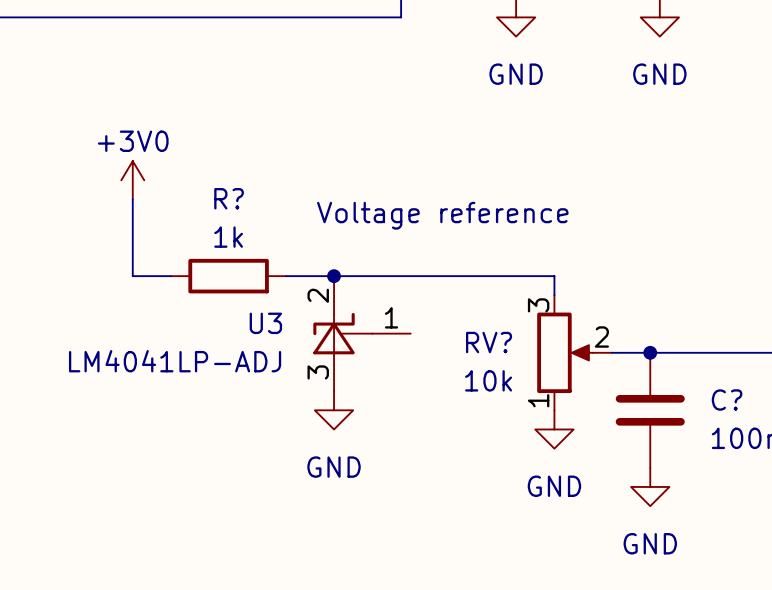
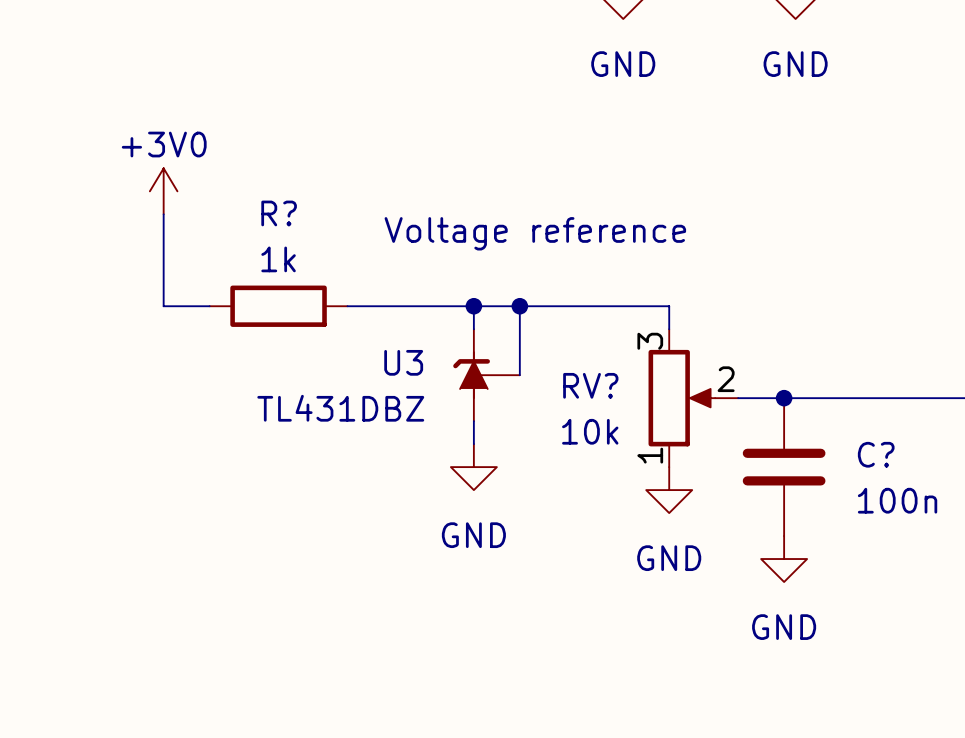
U3 symbol: [313, 276, 411, 392] -> [453, 329, 520, 422]
junction: (334, 276) -> none
wire: none -> (473, 306) (473, 329)
junction: none -> (473, 306)
wire: none -> (519, 306) (519, 375)
junction: none -> (519, 306)
U3 value: LM4041LP-ADJ (175, 361) -> TL431DBZ (340, 408)
wire: none -> (473, 421) (473, 444)
power symbol position: GND (334, 410) -> GND (473, 467)

